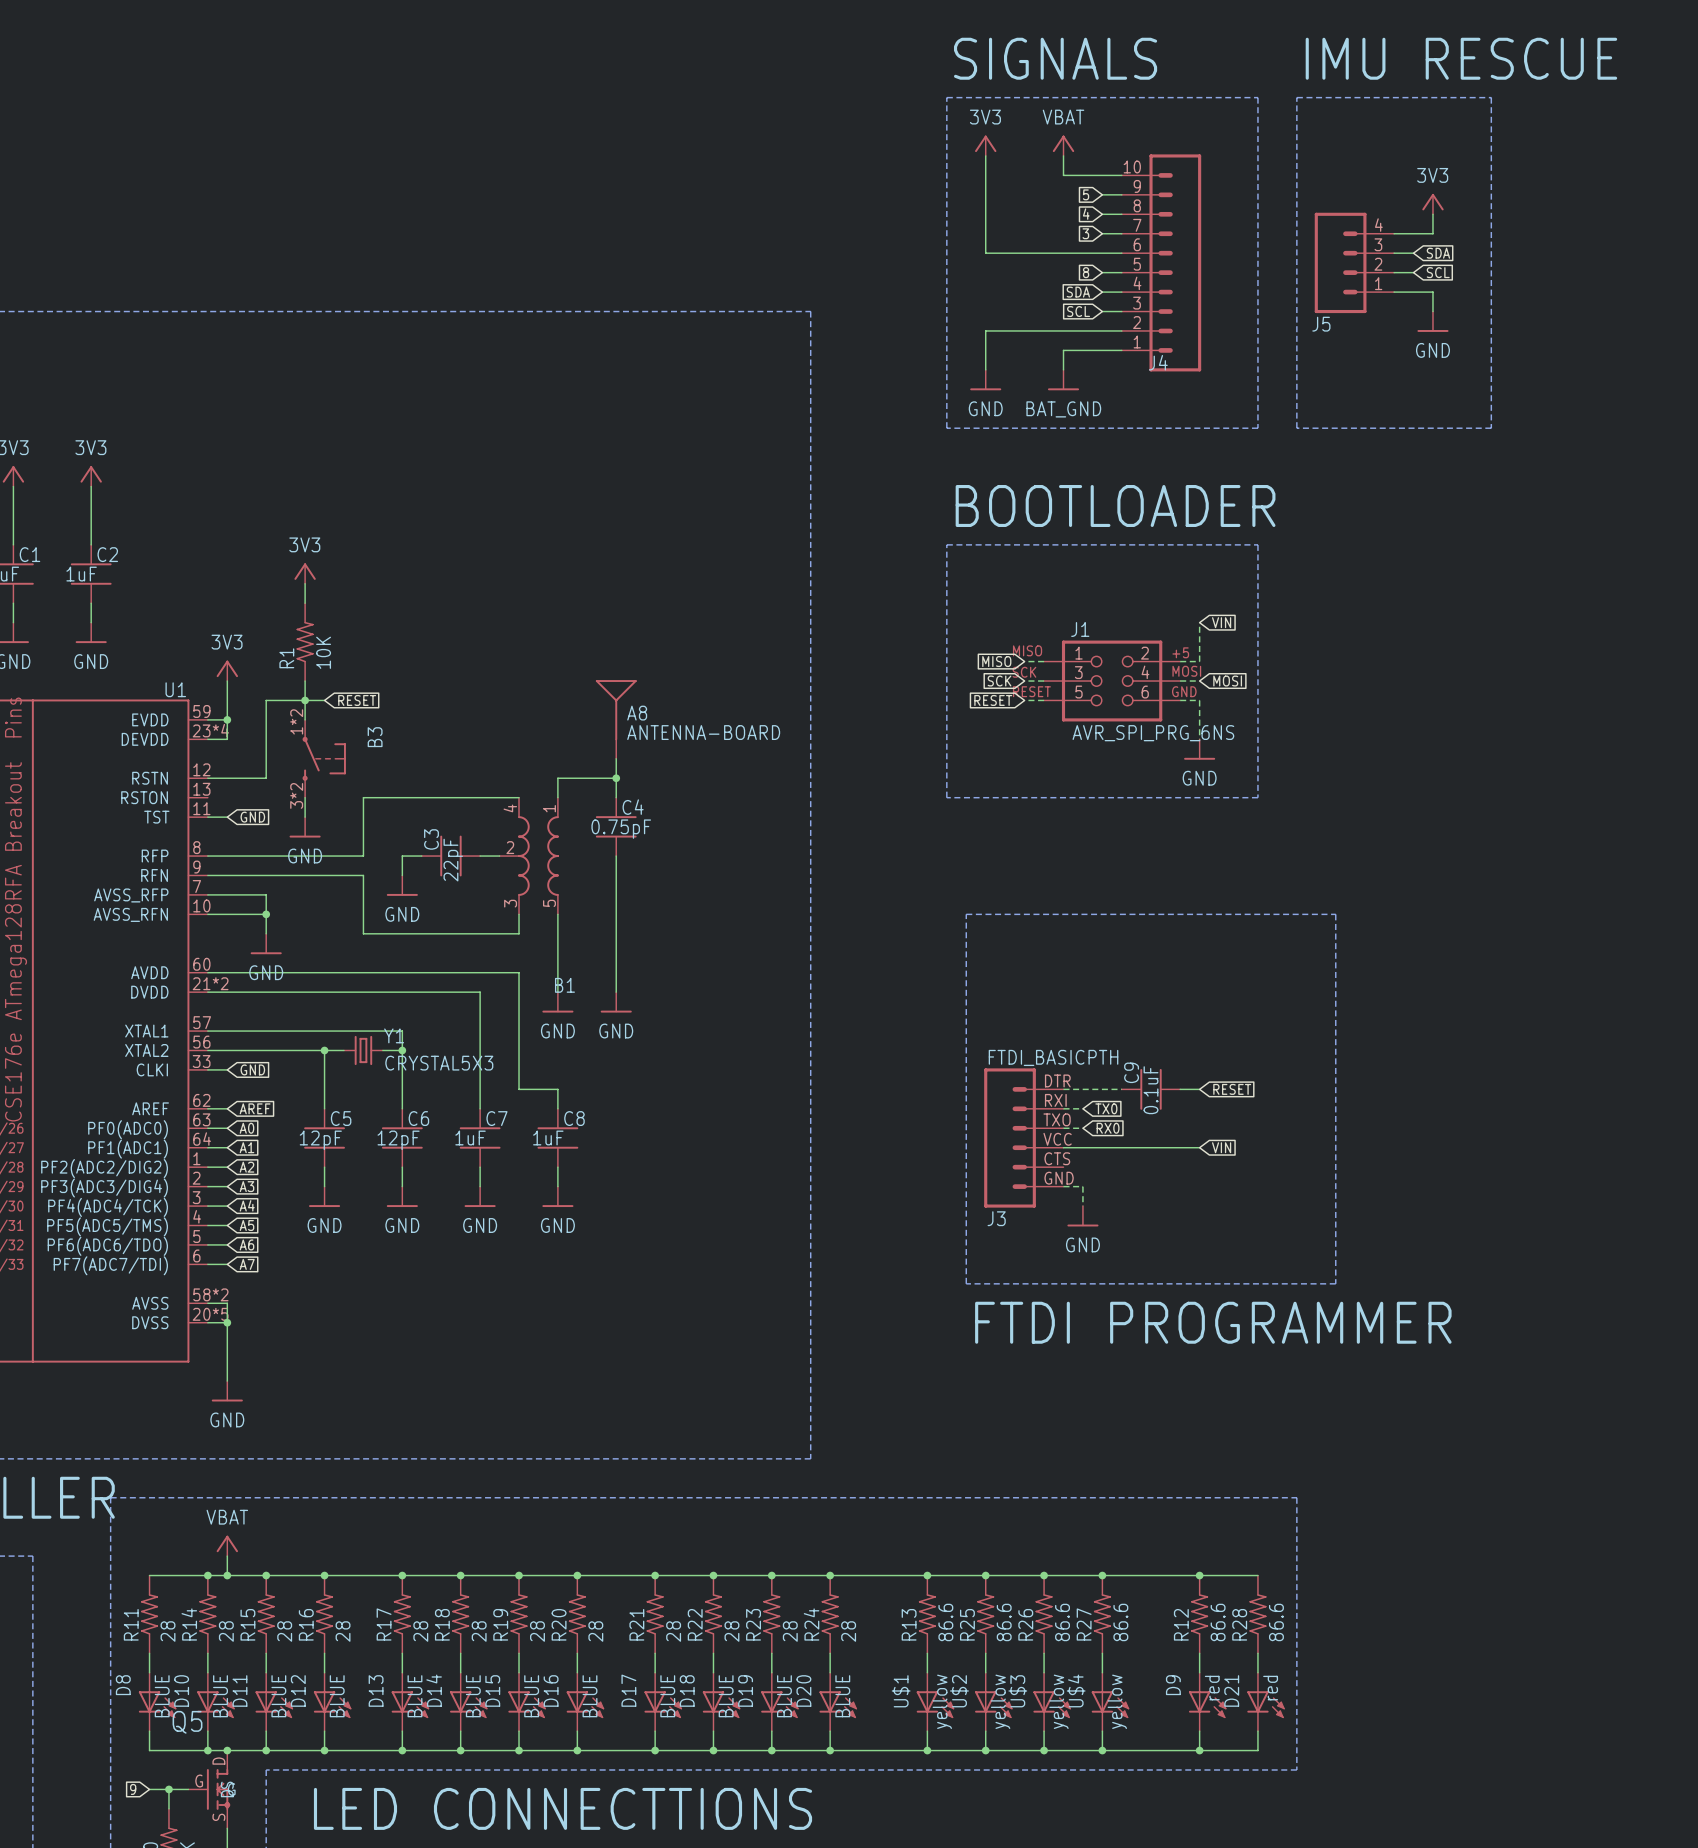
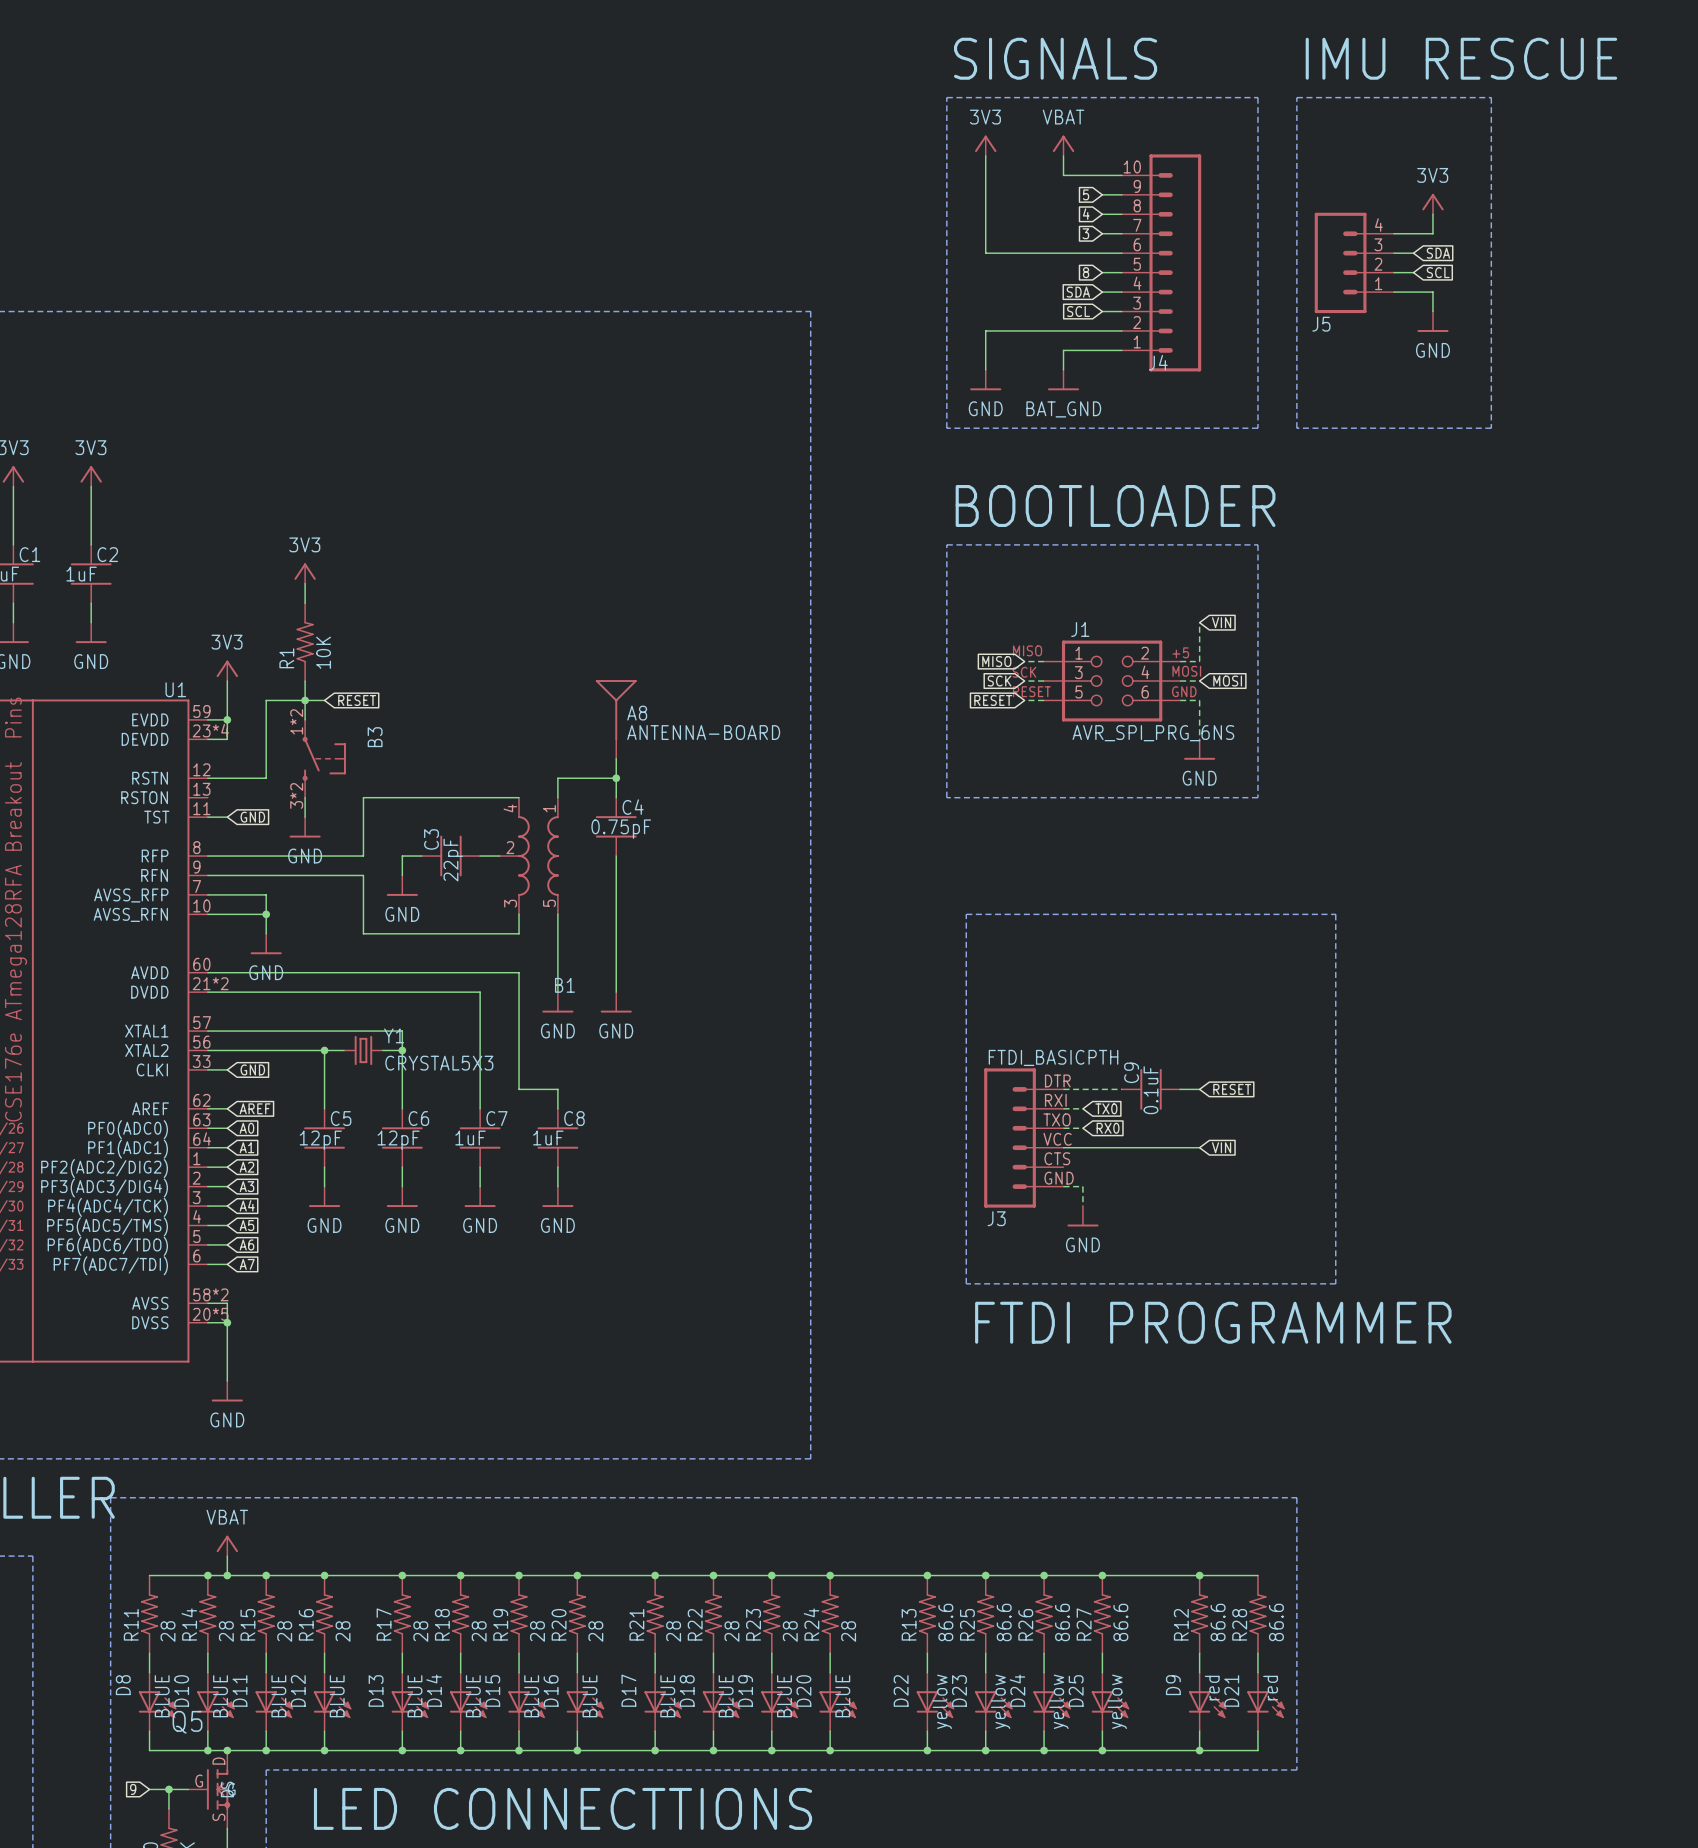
U$4 name: U$4 (1076, 1690) -> D25 (1076, 1690)
U$1 name: U$1 (901, 1691) -> D22 (901, 1690)
U$2 name: U$2 (959, 1691) -> D23 (959, 1690)
U$3 name: U$3 (1017, 1691) -> D24 (1017, 1690)

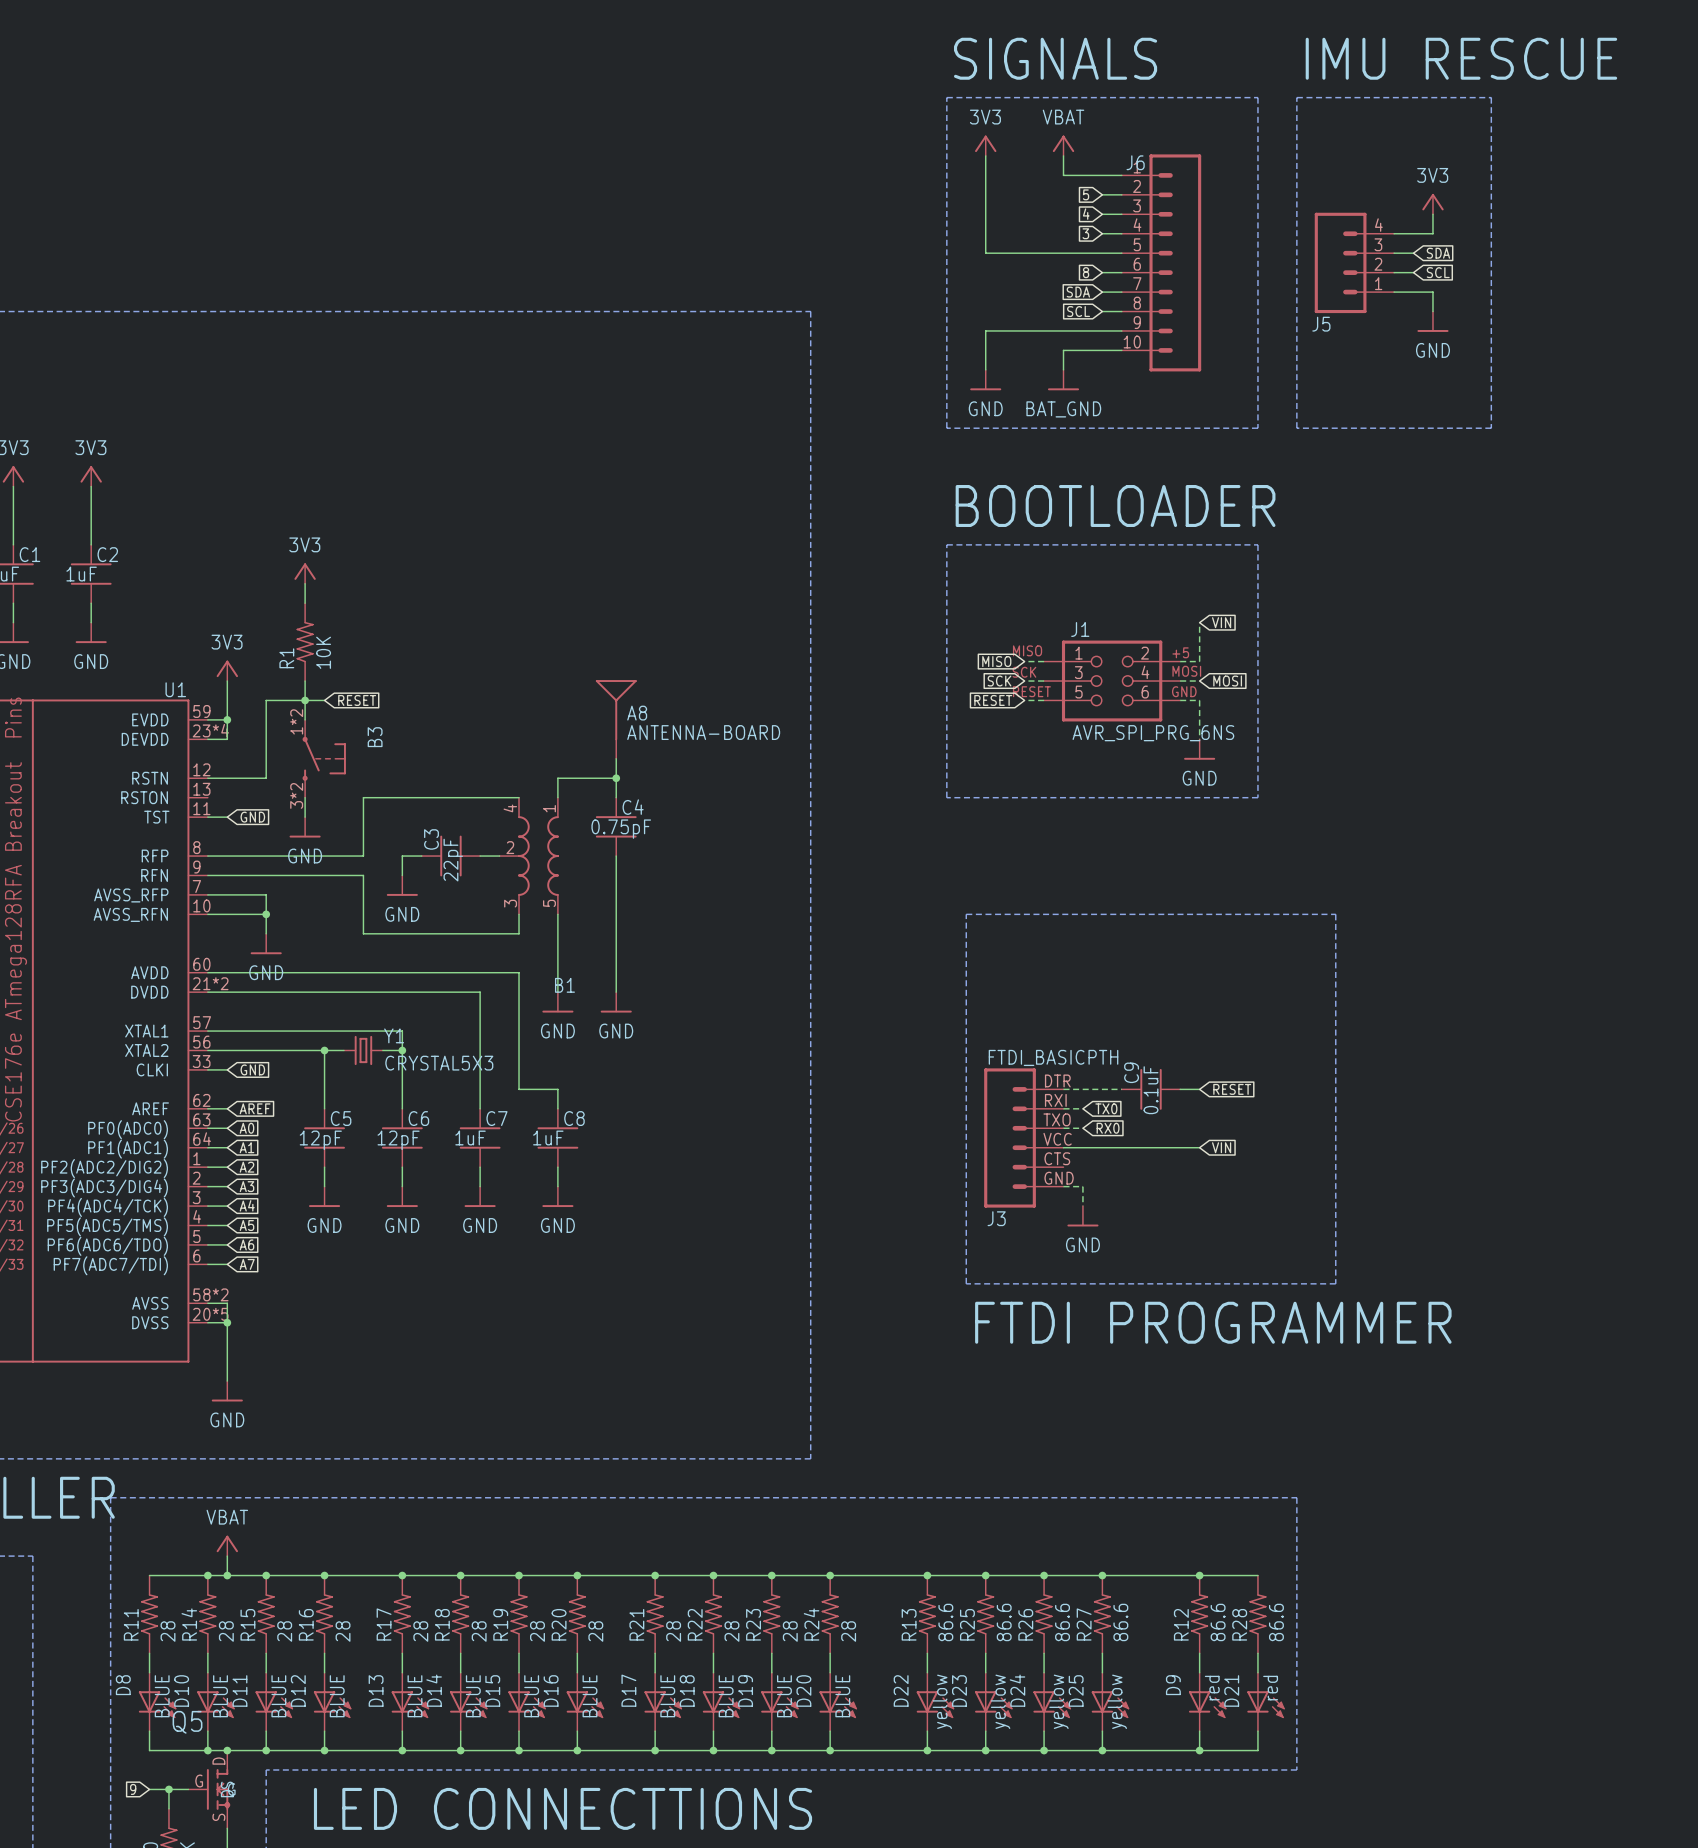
J4 flip: as is (1175, 262) -> up-down (1175, 262)
J4 name: J4 (1158, 362) -> J6 (1135, 162)

